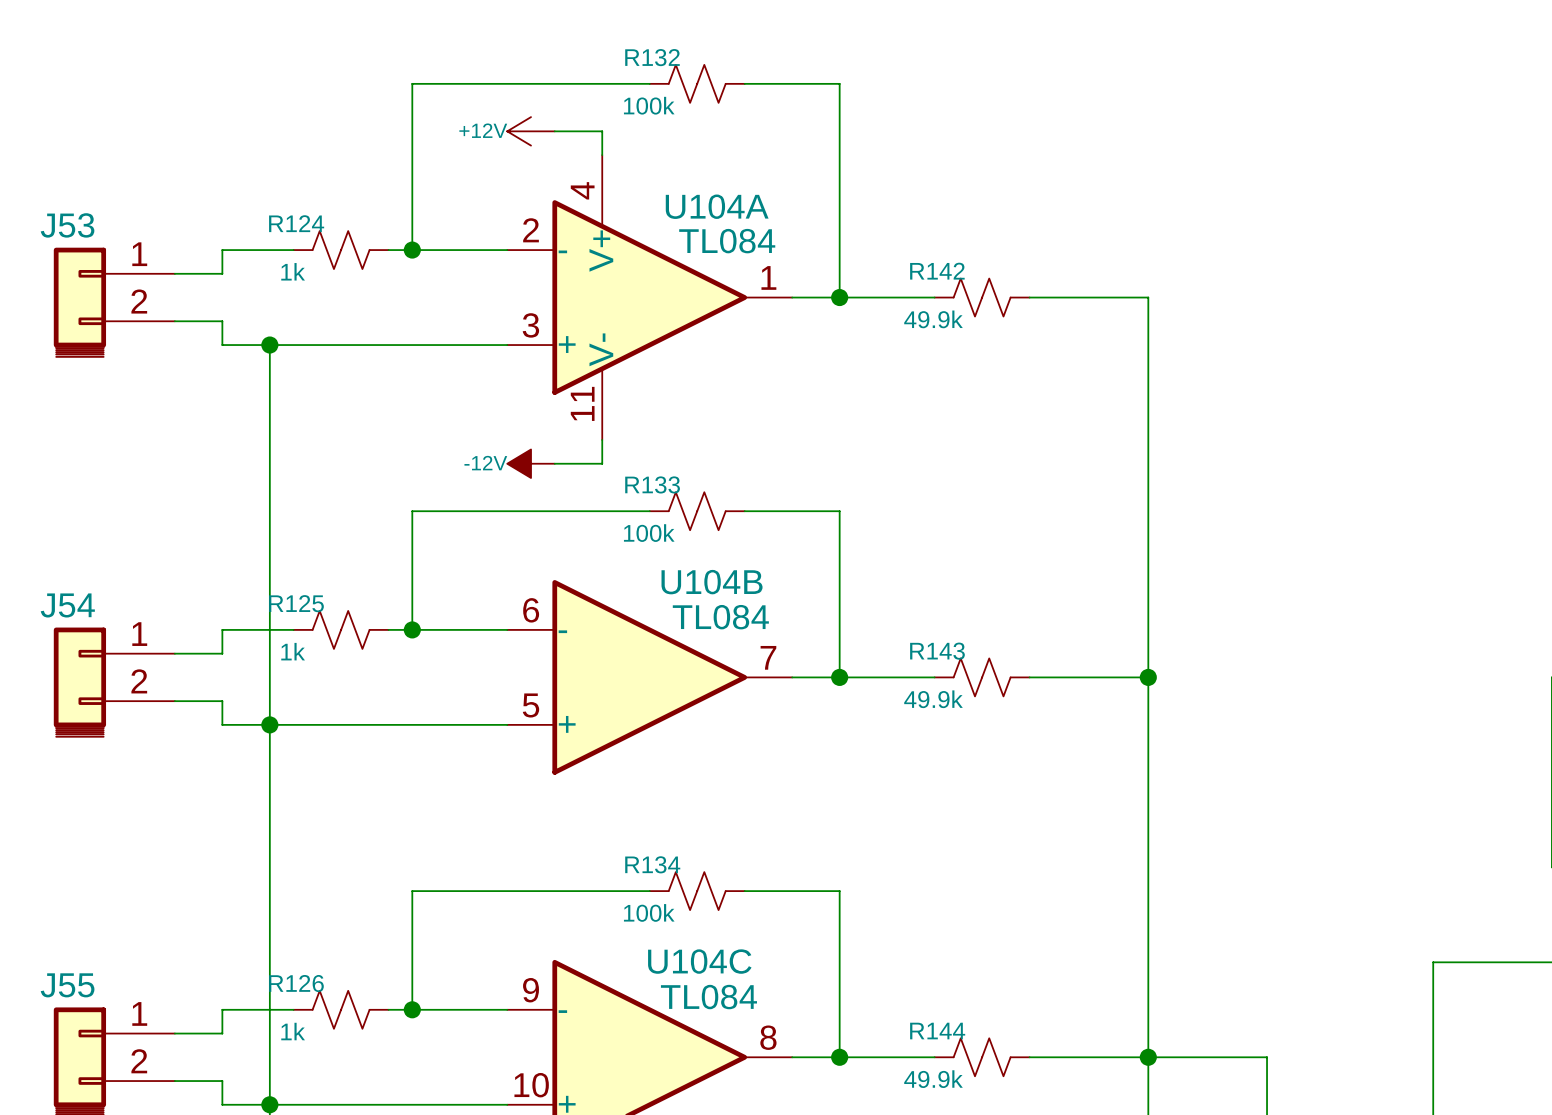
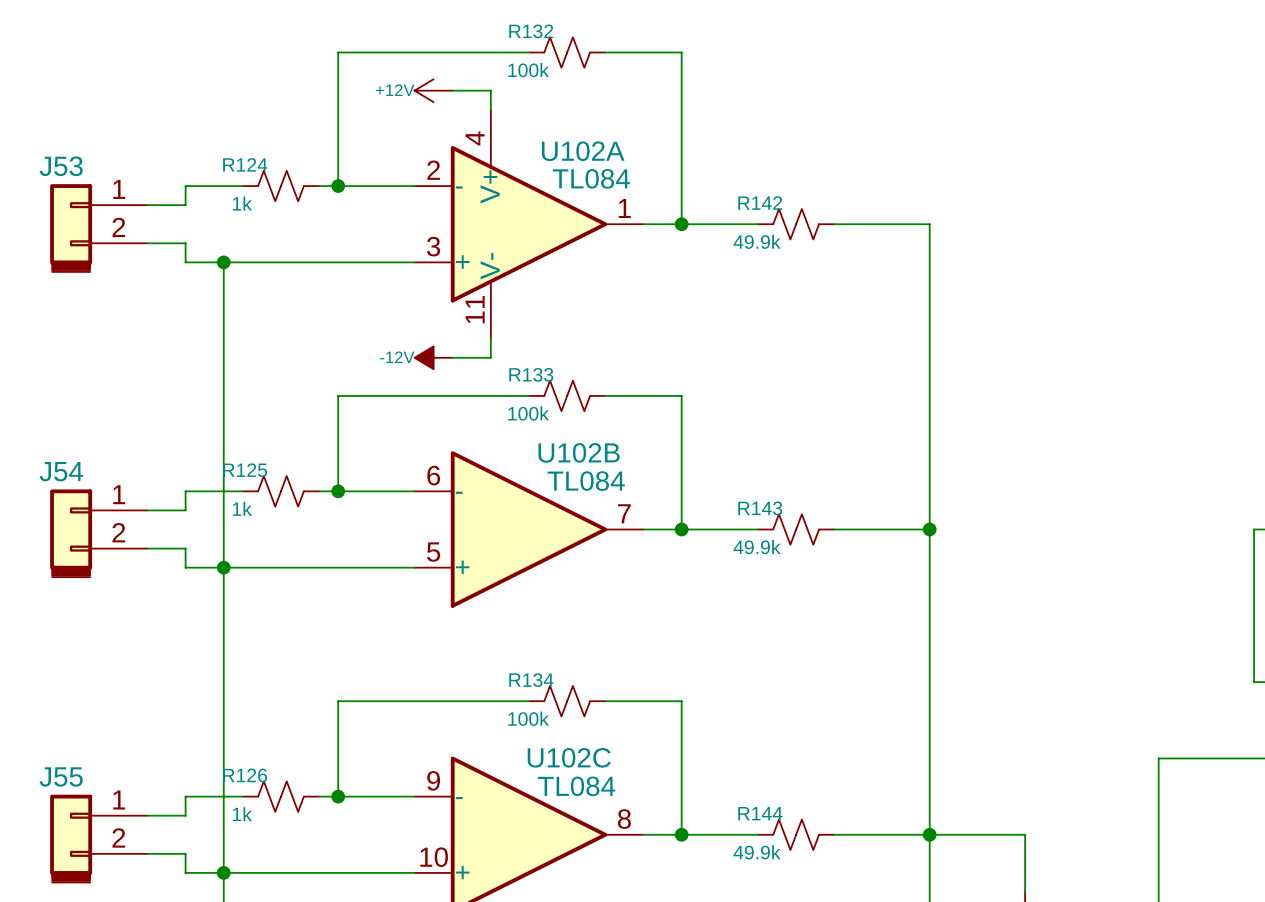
U104A name: U104A (717, 206) -> U102A (583, 151)
U104B name: U104B (712, 582) -> U102B (579, 452)
U104C name: U104C (699, 961) -> U102C (569, 757)

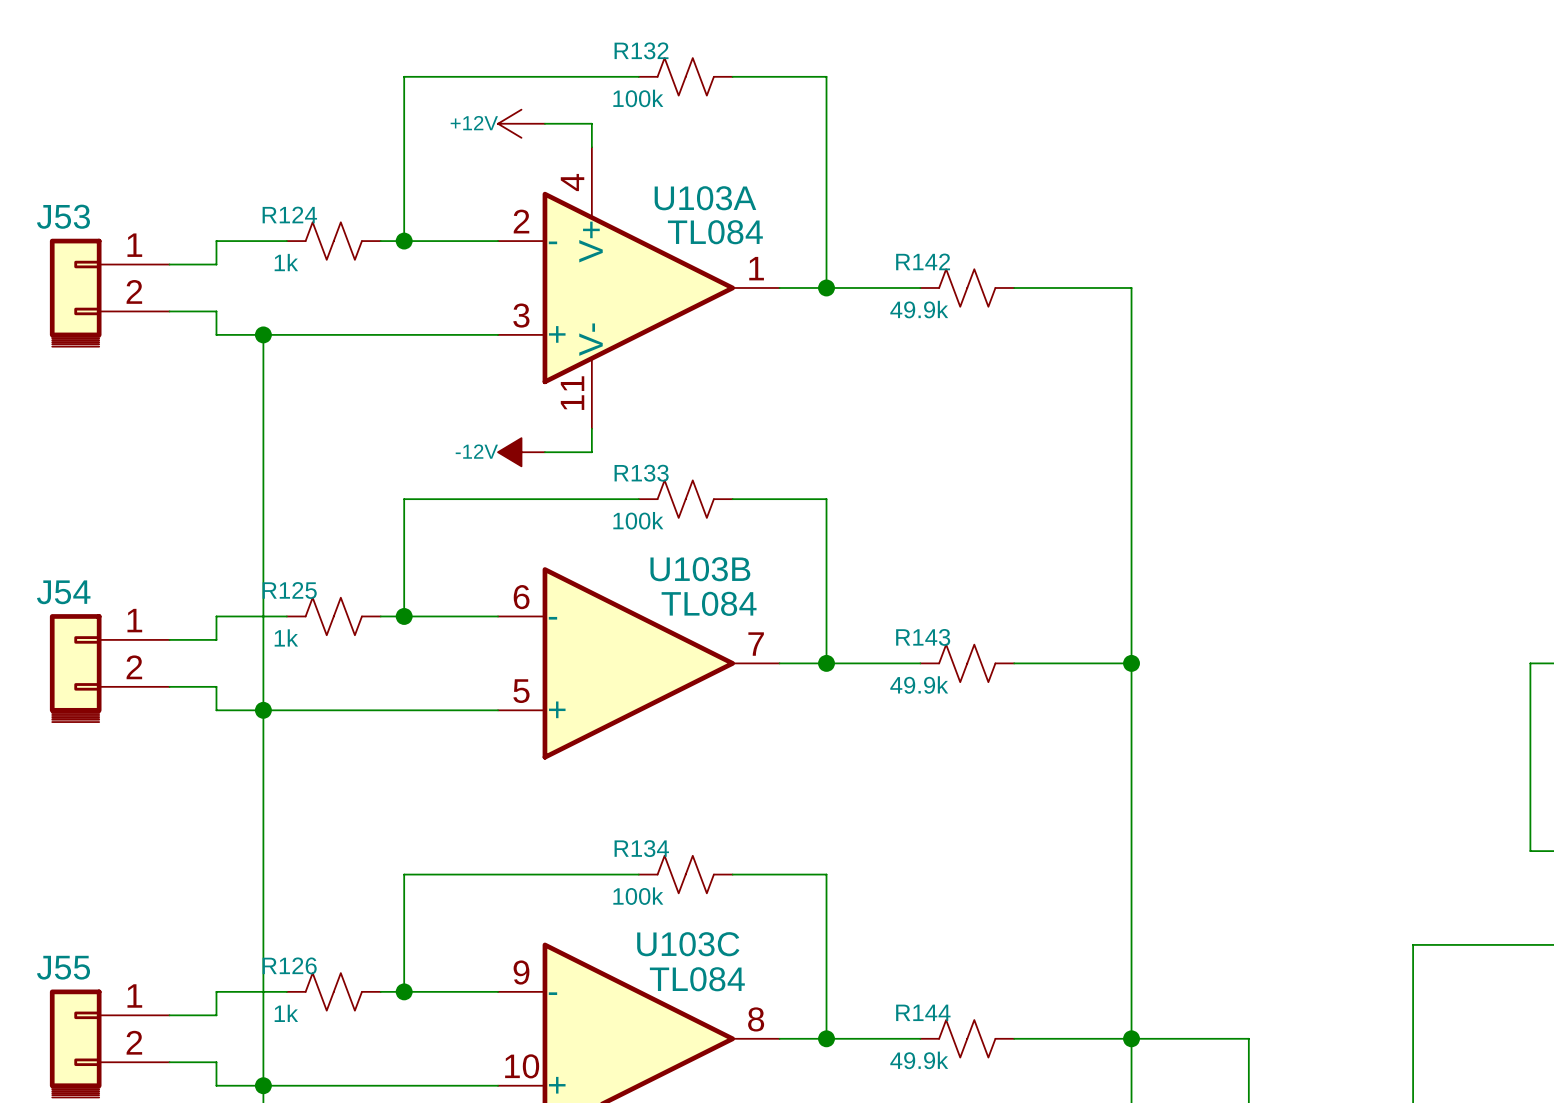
U102A name: U102A (583, 151) -> U103A (705, 198)
U102B name: U102B (579, 452) -> U103B (700, 569)
U102C name: U102C (569, 757) -> U103C (688, 944)

